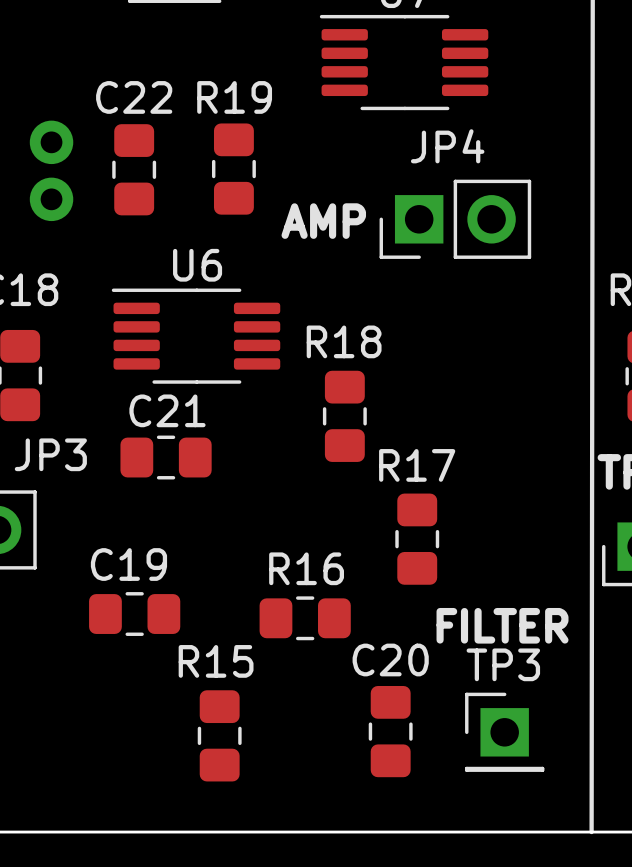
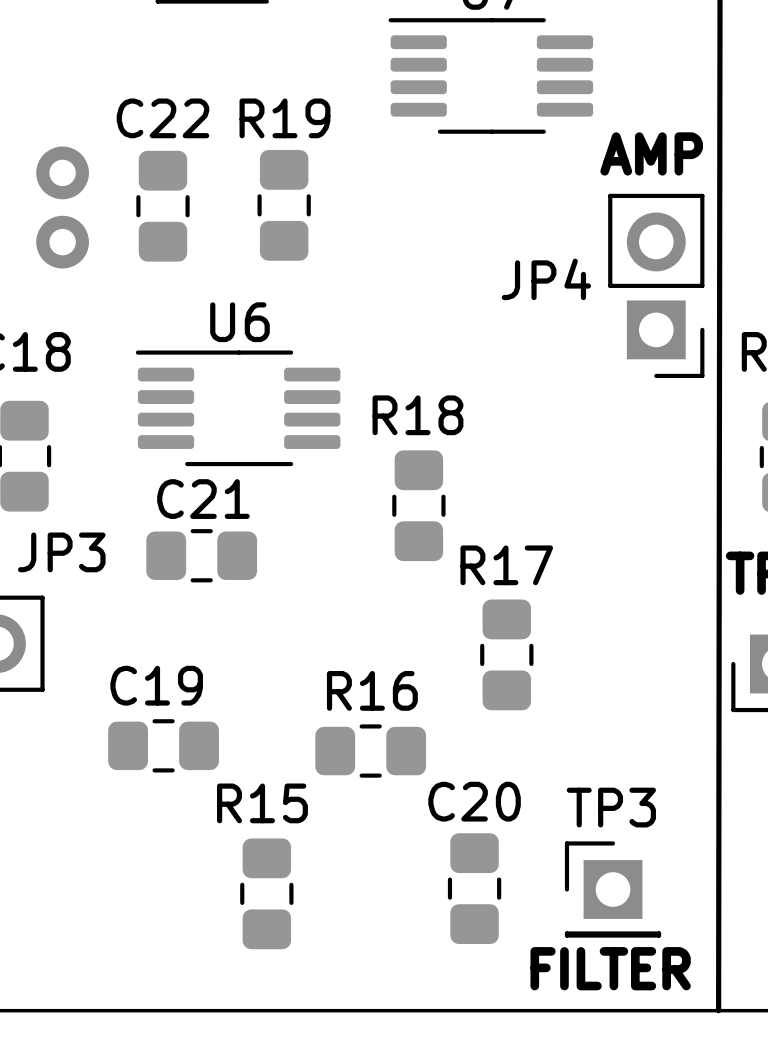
JP4 rotation: 0° (455, 219) -> 90° counterclockwise (656, 285)
text position: AMP (323, 221) -> AMP (651, 153)
text position: FILTER (502, 625) -> FILTER (610, 968)

